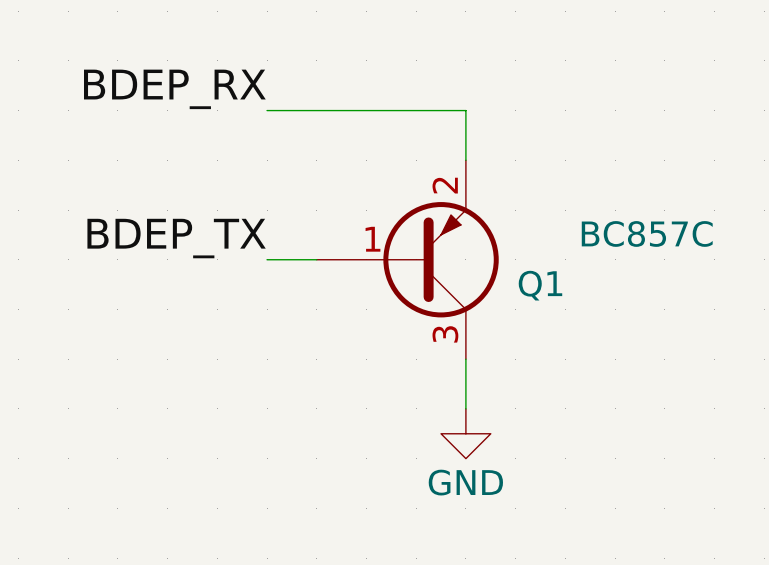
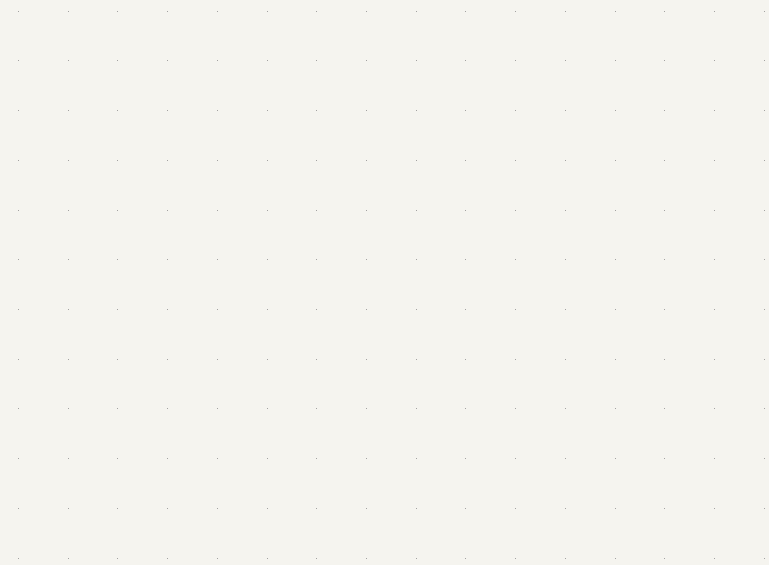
label: BDEP_RX (174, 89) -> none
wire: (267, 110) (465, 110) (465, 160) -> none
label: BDEP_TX (176, 238) -> none
wire: (267, 259) (316, 259) -> none
Q1: BC857C (407, 259) -> none
wire: (465, 359) (465, 408) -> none
power symbol: GND (465, 433) -> none

